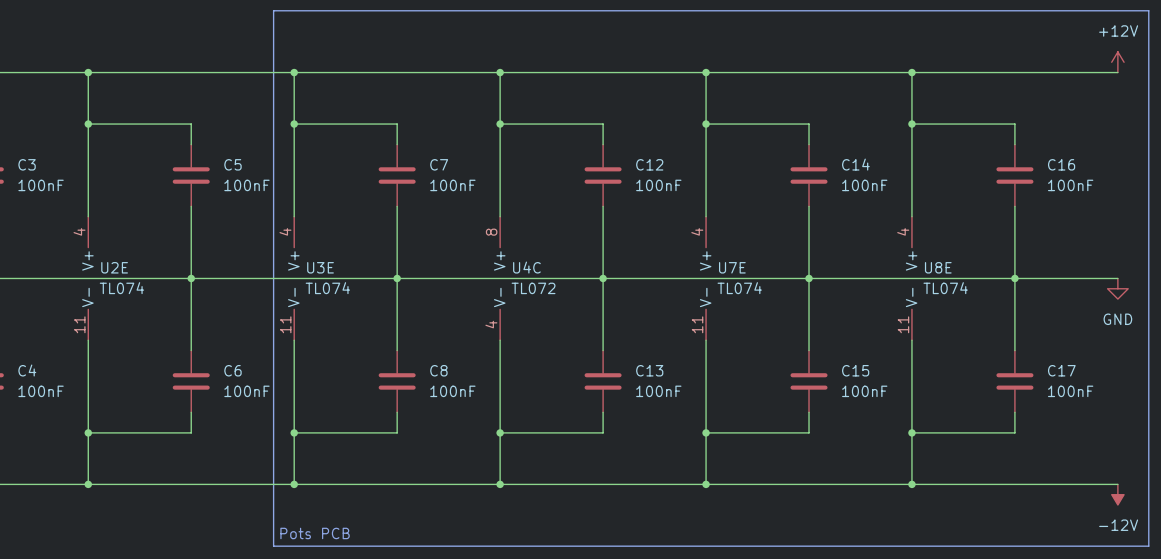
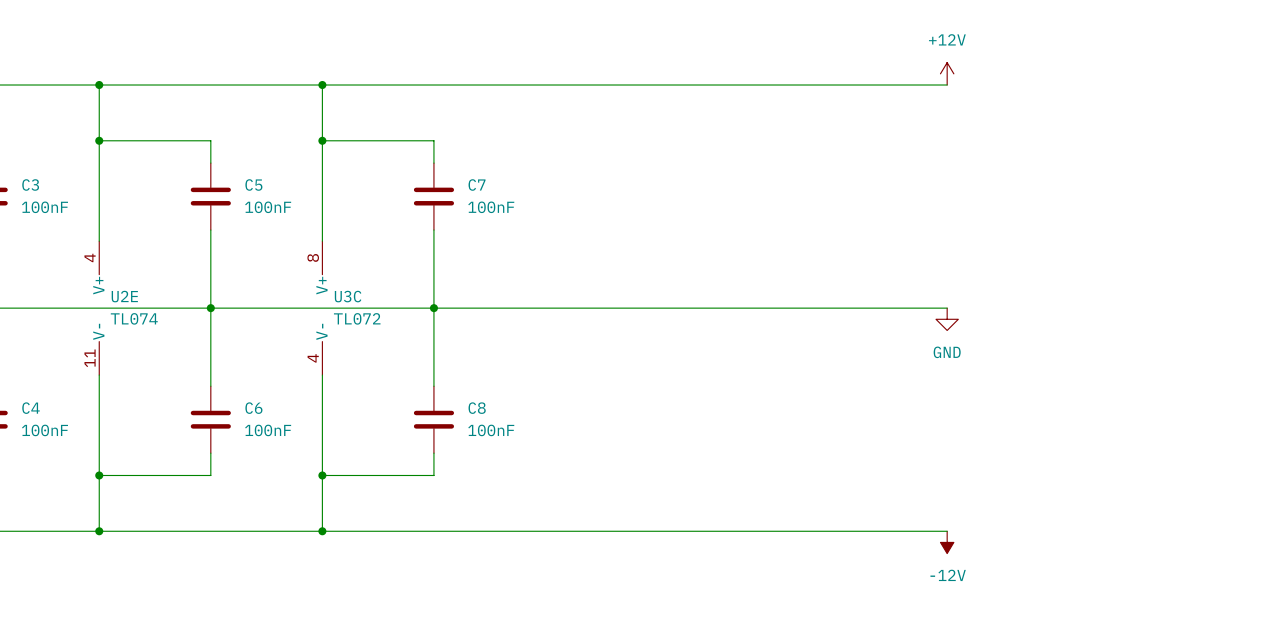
line: (273, 10) (1148, 10) (1148, 546) (273, 546) (273, 10) -> none
power symbol: none -> +12V (947, 73)
power symbol: +12V (1117, 62) -> none
wire: (500, 72) (500, 216) -> none
junction: (500, 72) -> none
wire: (706, 72) (706, 216) -> none
junction: (706, 72) -> none
wire: (870, 72) (1117, 72) -> none
wire: (911, 72) (911, 216) -> none
junction: (911, 72) -> none
wire: (500, 124) (603, 124) (603, 144) -> none
junction: (500, 124) -> none
wire: (706, 124) (809, 124) (809, 144) -> none
junction: (706, 124) -> none
wire: (911, 124) (1014, 124) (1014, 144) -> none
junction: (911, 124) -> none
C12: 100nF (603, 175) -> none
C14: 100nF (809, 175) -> none
C16: 100nF (1014, 175) -> none
wire: (603, 206) (603, 350) -> none
wire: (809, 206) (809, 350) -> none
wire: (1014, 206) (1014, 350) -> none
U3E pin number: 4 (285, 231) -> 8 (313, 257)
U3E name: U3E (320, 267) -> U3C (348, 296)
U4C: TL072 (500, 278) -> none
junction: (603, 278) -> none
U7E: TL074 (706, 278) -> none
junction: (809, 278) -> none
wire: (870, 278) (1117, 278) -> none
U8E: TL074 (911, 278) -> none
junction: (1014, 278) -> none
U3E value: TL074 (327, 288) -> TL072 (357, 318)
power symbol: none -> GND (947, 319)
power symbol: GND (1117, 288) -> none
U3E pin number: 11 (285, 324) -> 4 (313, 358)
wire: (500, 340) (500, 484) -> none
wire: (706, 340) (706, 484) -> none
wire: (911, 340) (911, 484) -> none
C13: 100nF (603, 381) -> none
C15: 100nF (809, 381) -> none
C17: 100nF (1014, 381) -> none
wire: (603, 412) (603, 432) (500, 432) -> none
wire: (809, 412) (809, 432) (706, 432) -> none
wire: (1014, 412) (1014, 432) (911, 432) -> none
junction: (500, 432) -> none
junction: (706, 432) -> none
junction: (911, 432) -> none
junction: (500, 484) -> none
junction: (706, 484) -> none
wire: (870, 484) (1117, 484) -> none
junction: (911, 484) -> none
power symbol: none -> -12V (947, 542)
power symbol: -12V (1117, 494) -> none
text: Pots PCB (315, 533) -> none

